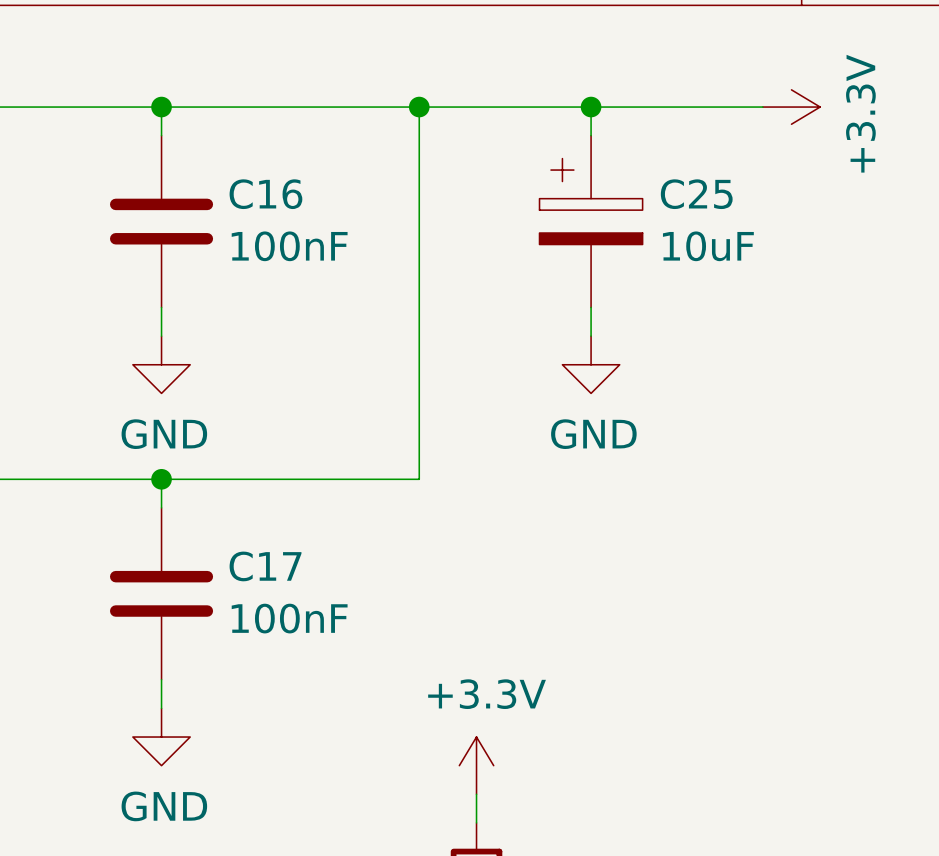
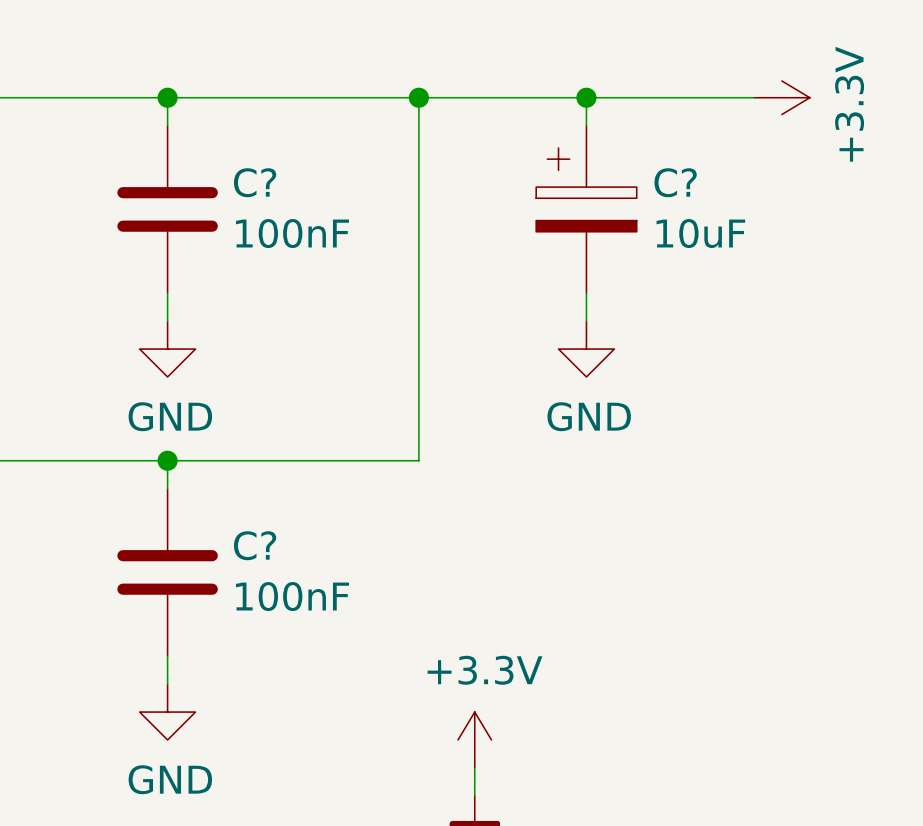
C16 name: C16 (265, 194) -> C? (255, 182)
C25 name: C25 (696, 194) -> C? (675, 182)
C17 name: C17 (265, 566) -> C? (255, 545)

